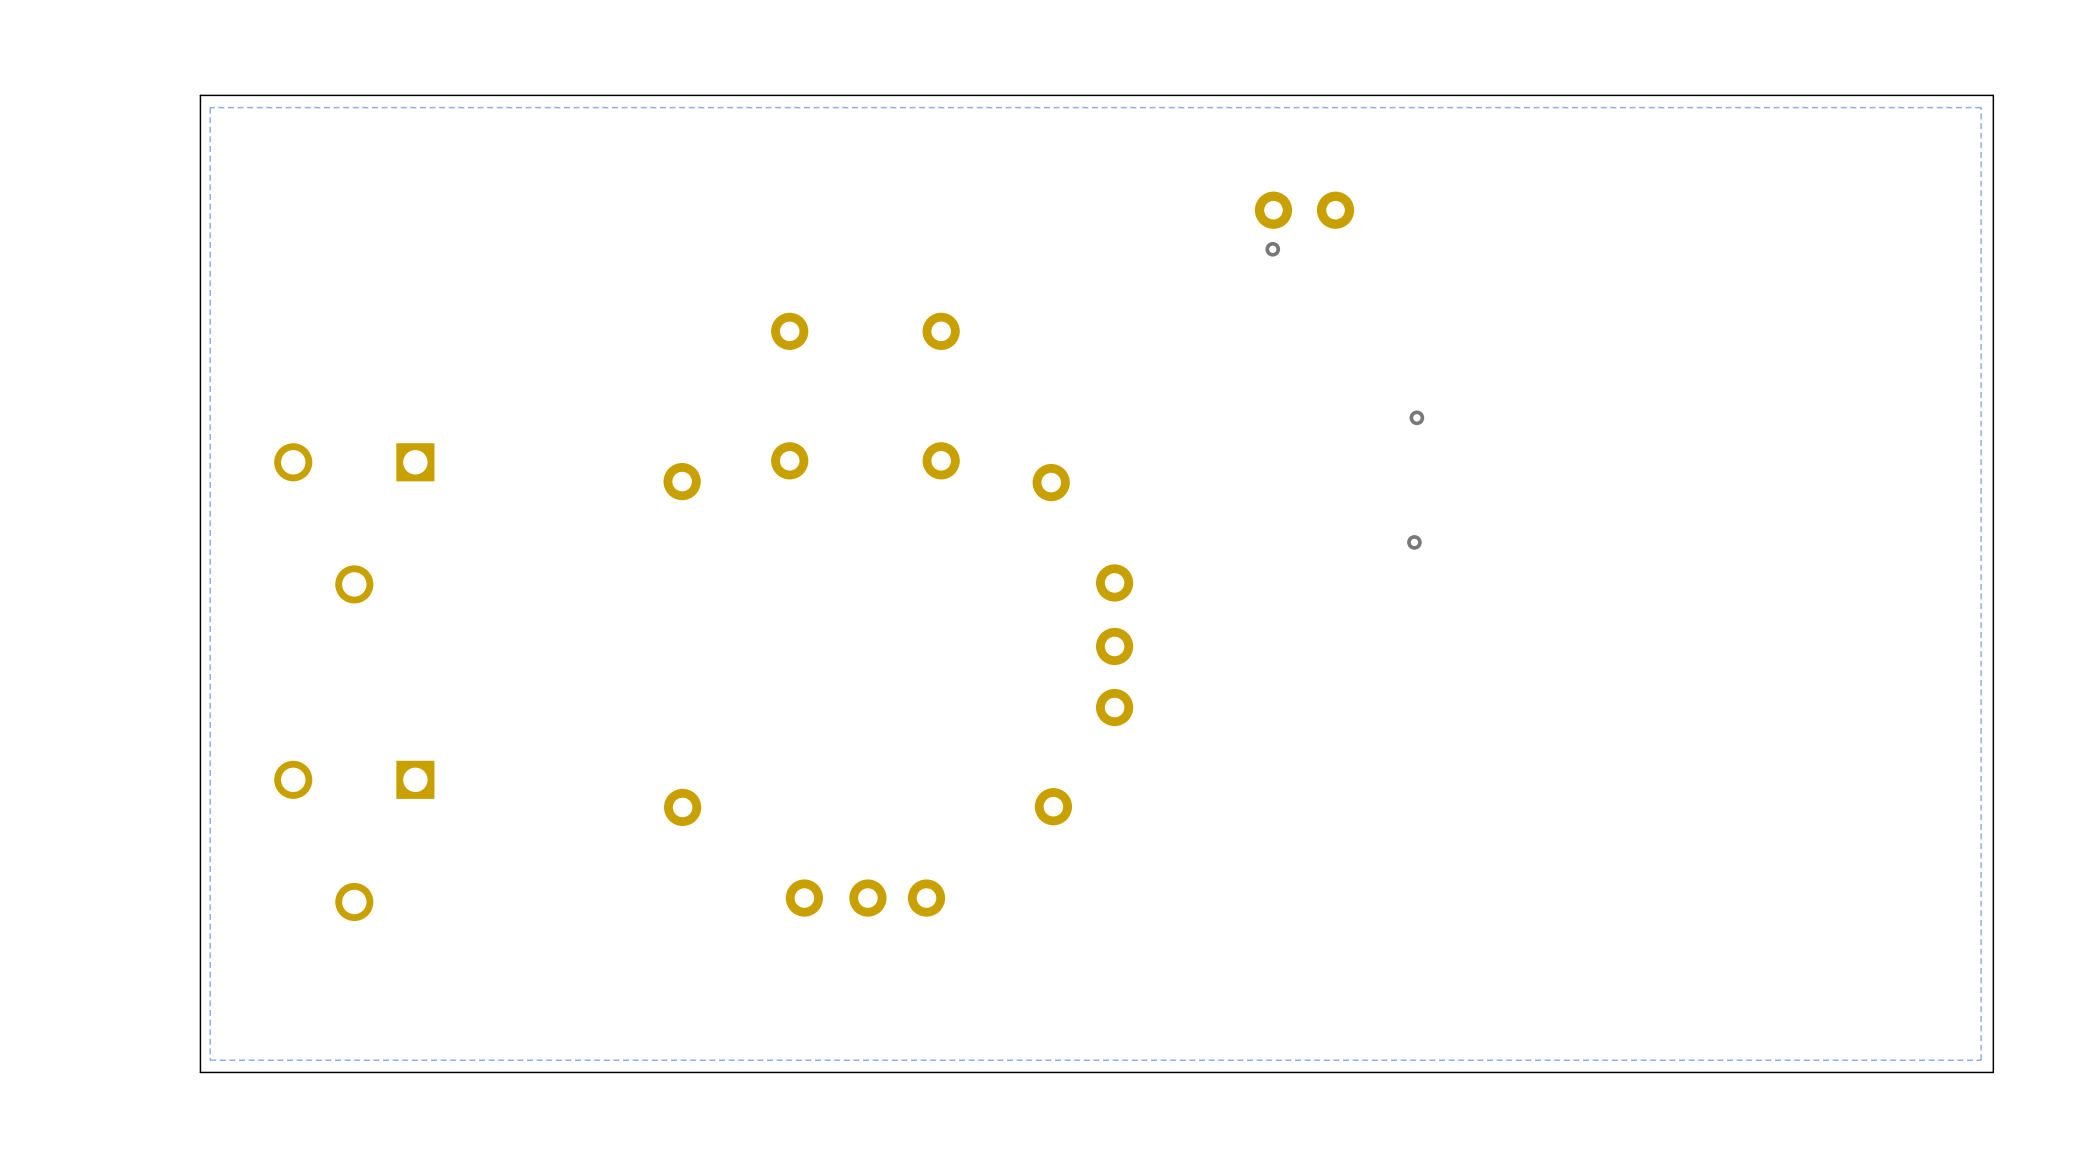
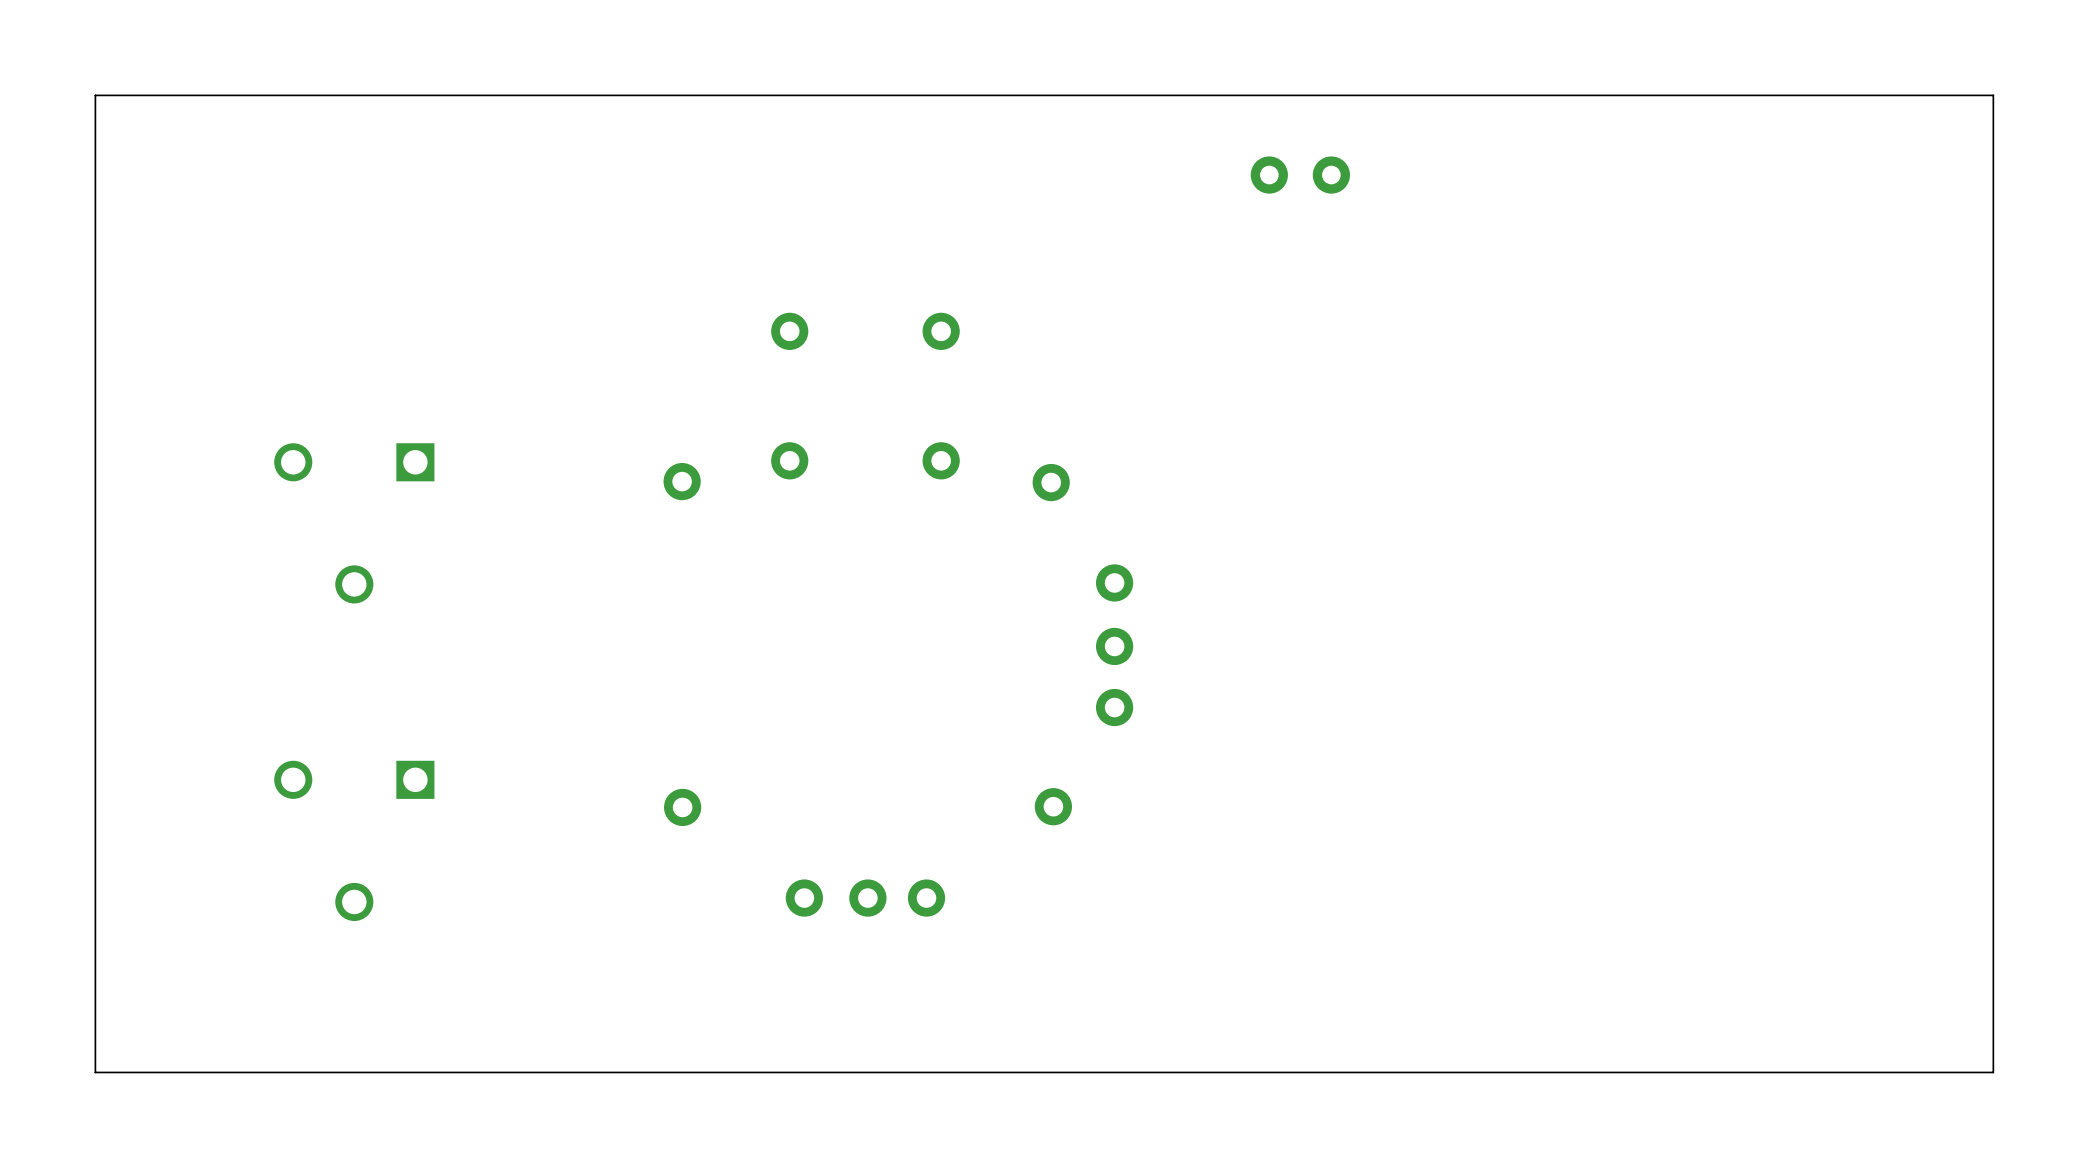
board edge: (200, 95) (200, 1072) -> (200, 95) (95, 95) (95, 1072) (200, 1072)
zone outline: (1981, 107) (210, 107) (210, 1060) (1981, 1060) (1981, 107) -> none
part position: (1304, 210) -> (1300, 175)
via: (1272, 249) -> none
via: (1416, 417) -> none
via: (1414, 542) -> none

